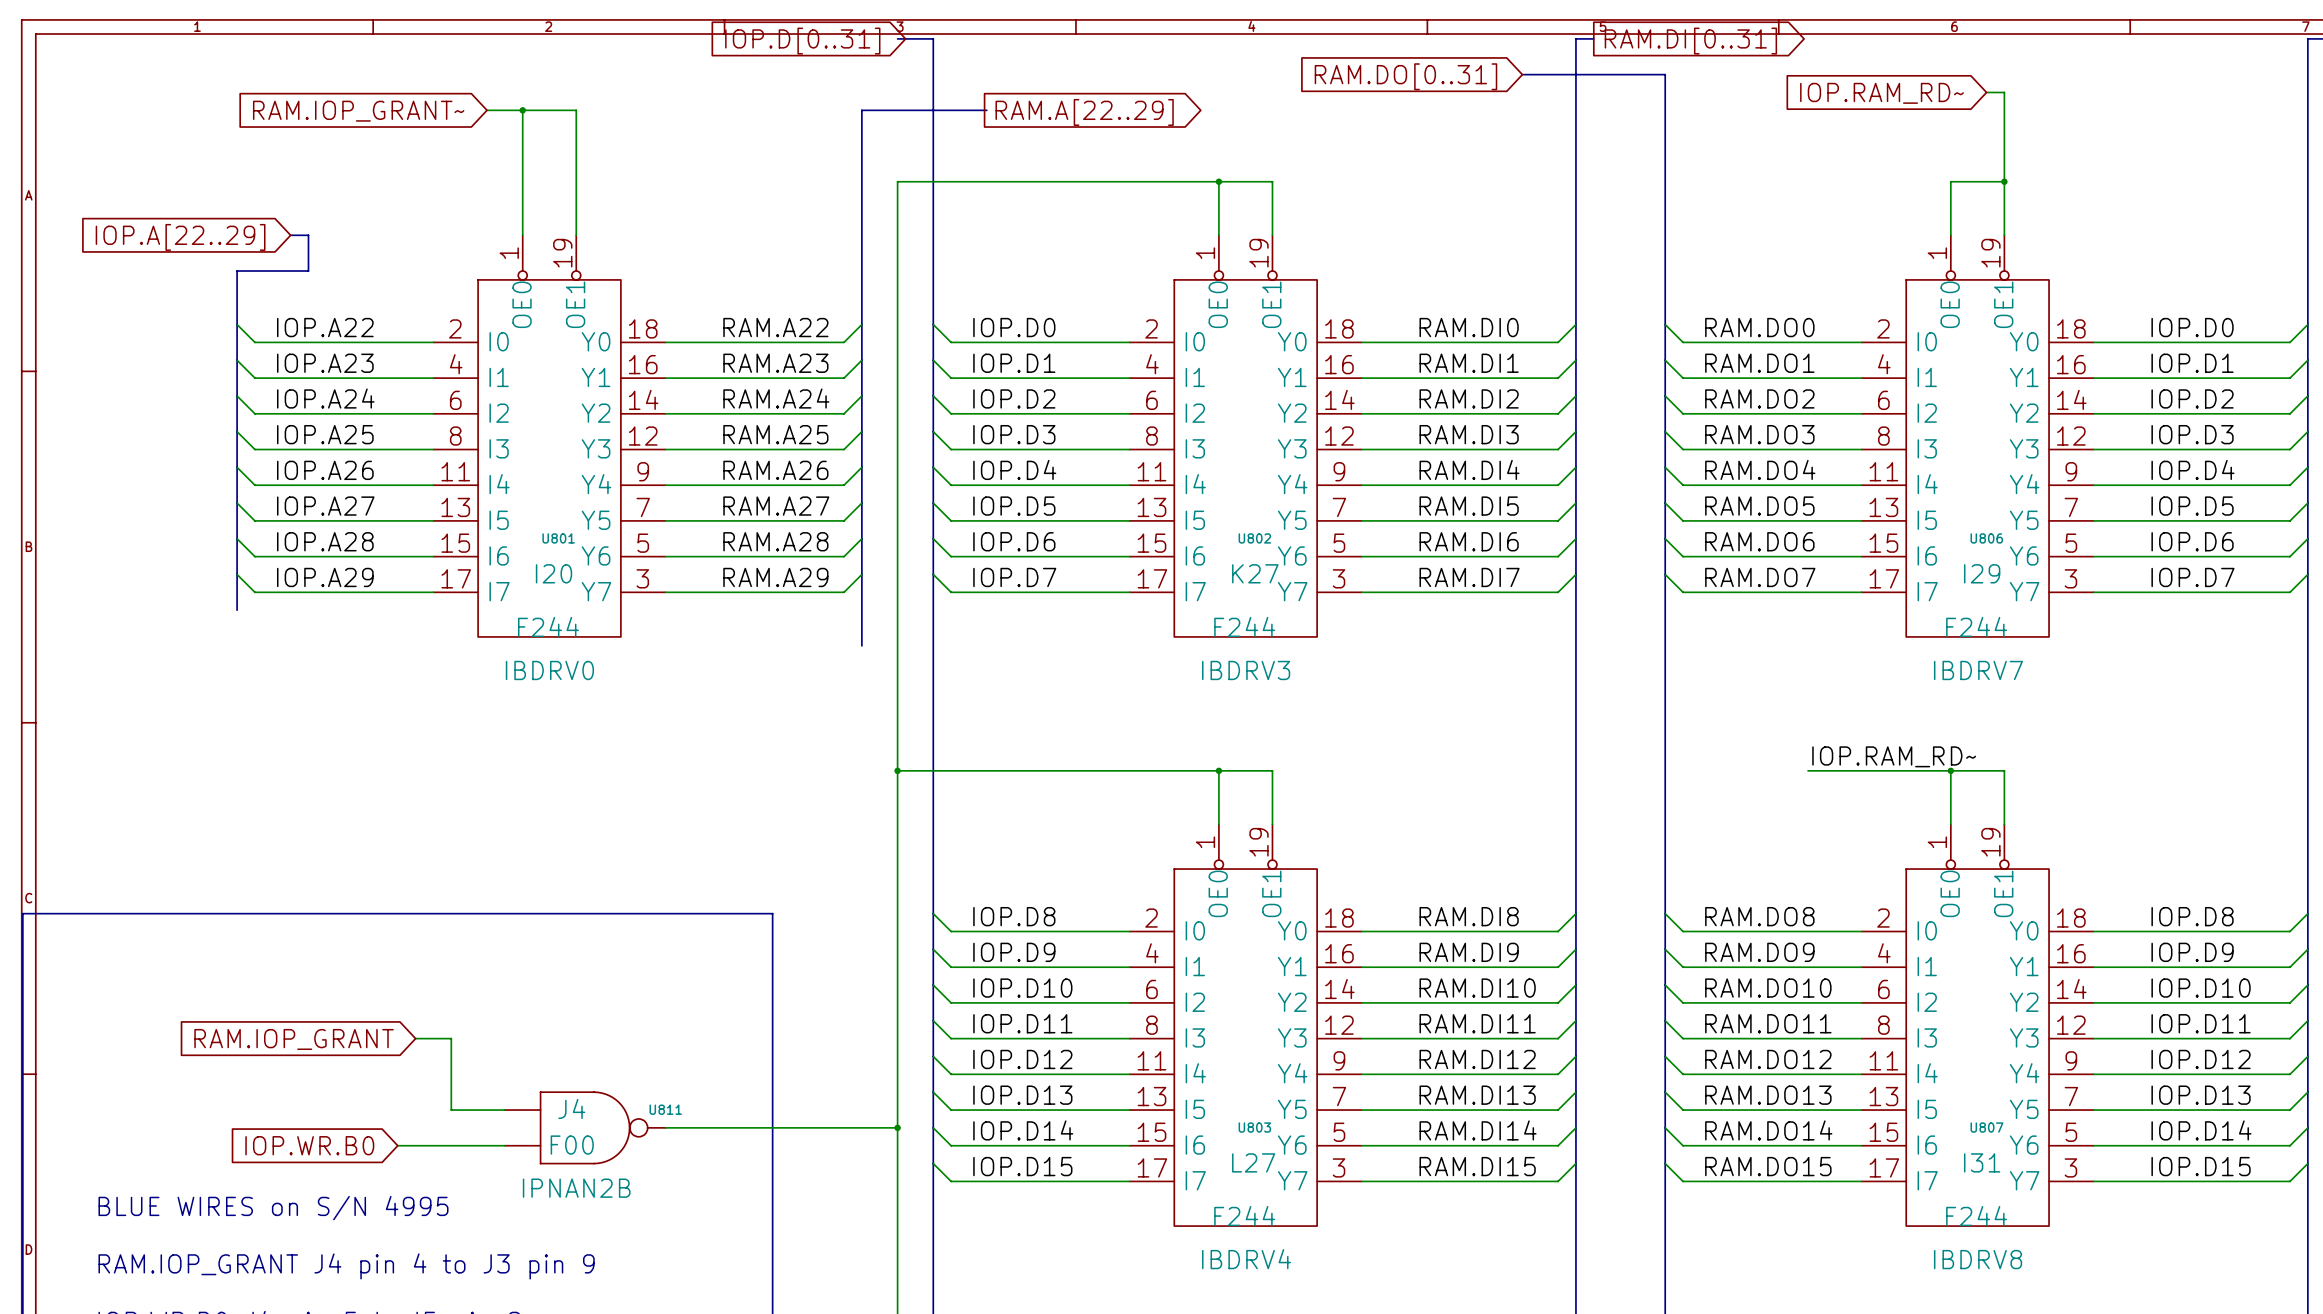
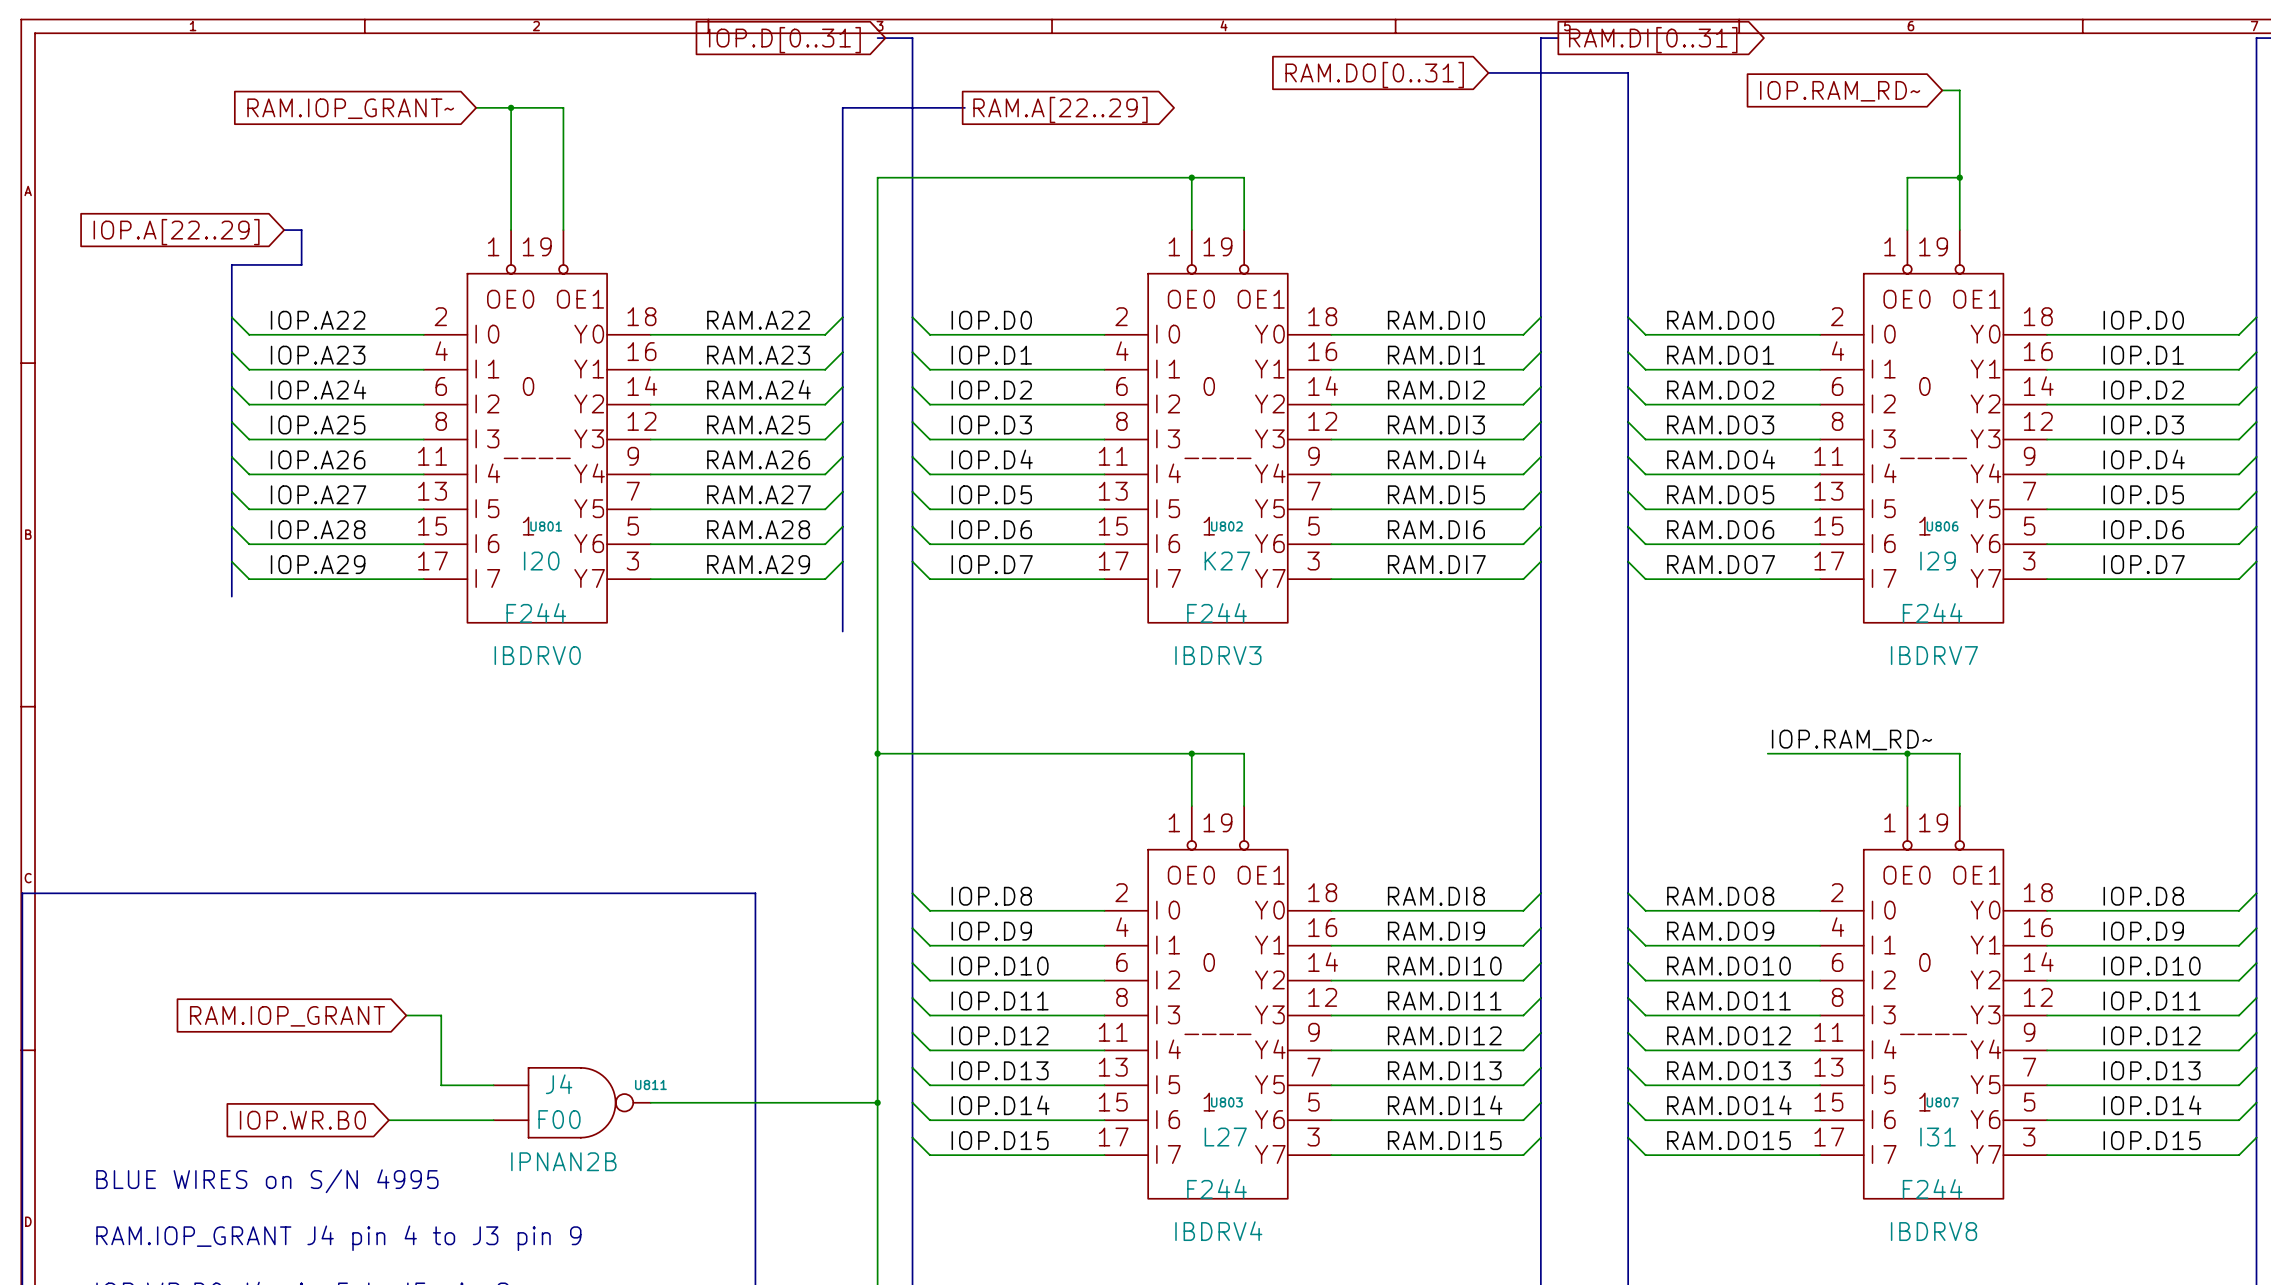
U801 symbol: [433, 235, 666, 637] -> [423, 230, 651, 623]
U802 symbol: [1129, 235, 1362, 637] -> [1104, 230, 1332, 623]
U806 symbol: [1861, 235, 2094, 637] -> [1820, 230, 2048, 623]
U803 symbol: [1129, 824, 1362, 1227] -> [1104, 806, 1332, 1199]
U807 symbol: [1861, 824, 2094, 1227] -> [1820, 806, 2048, 1199]

